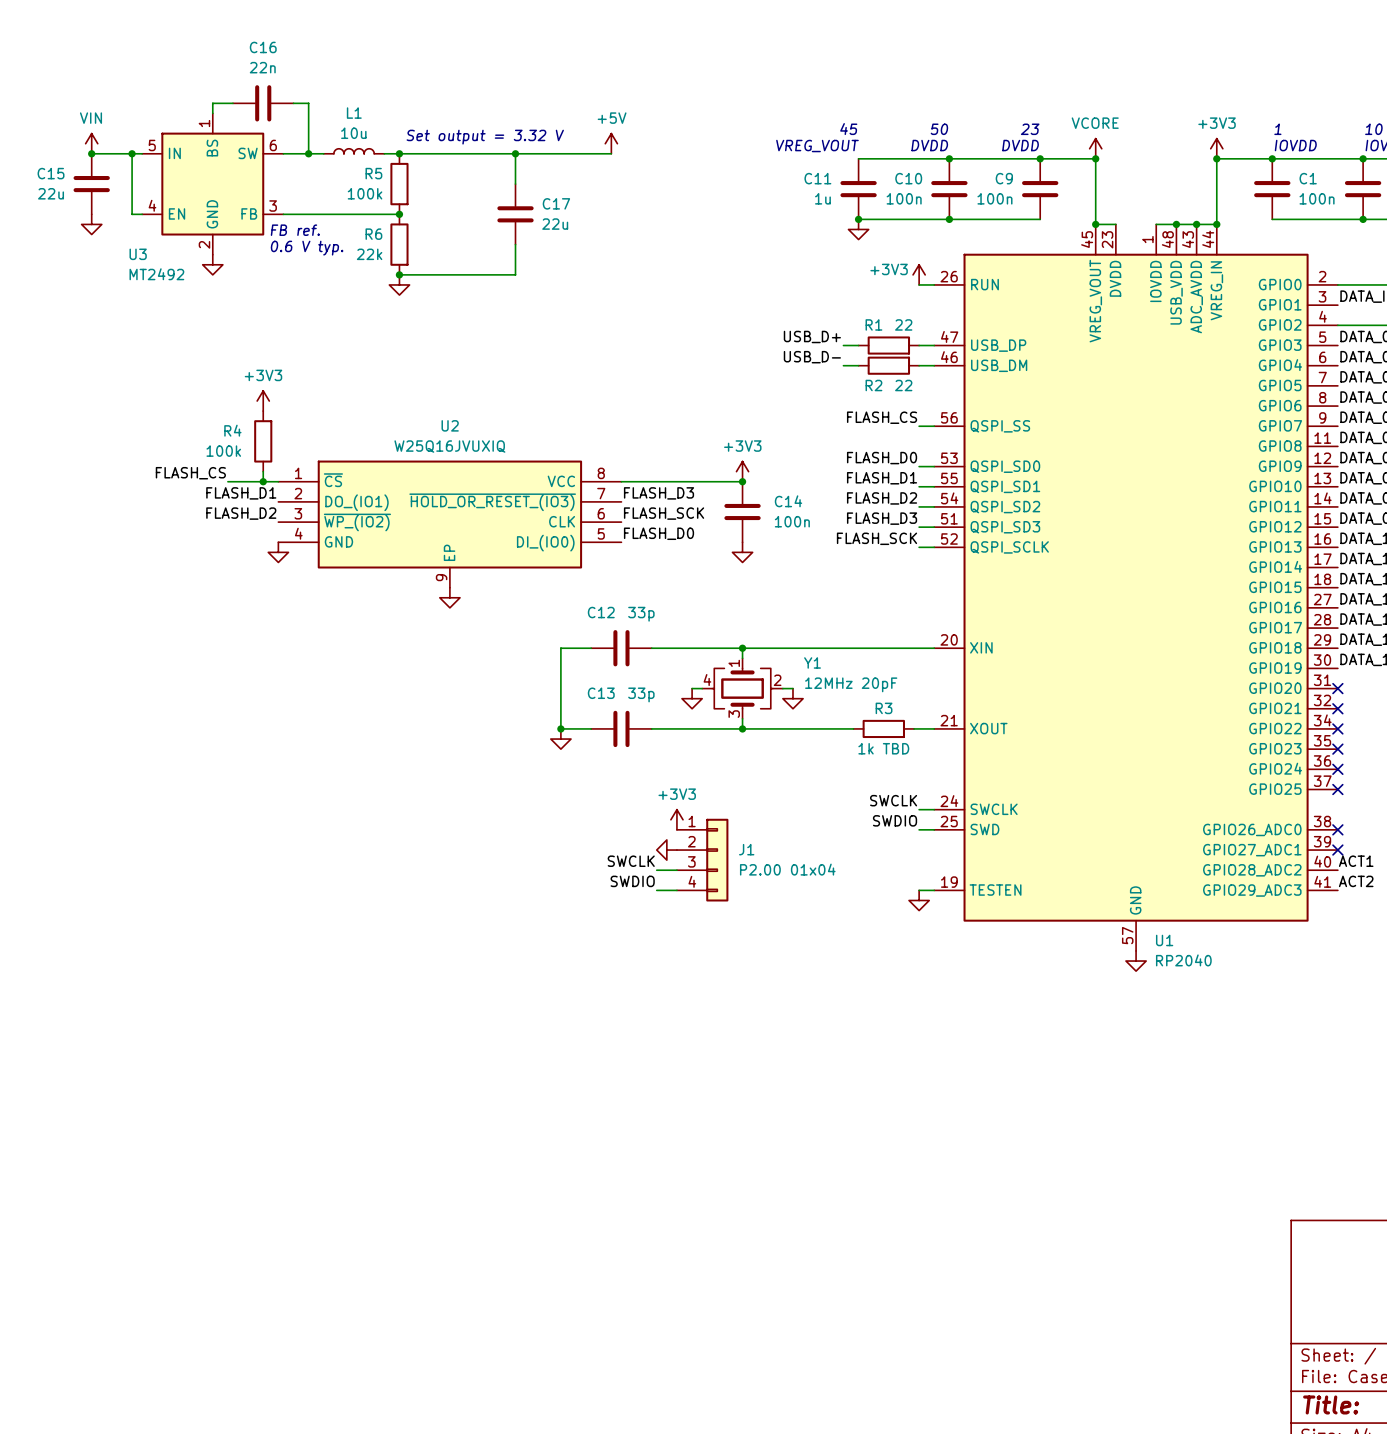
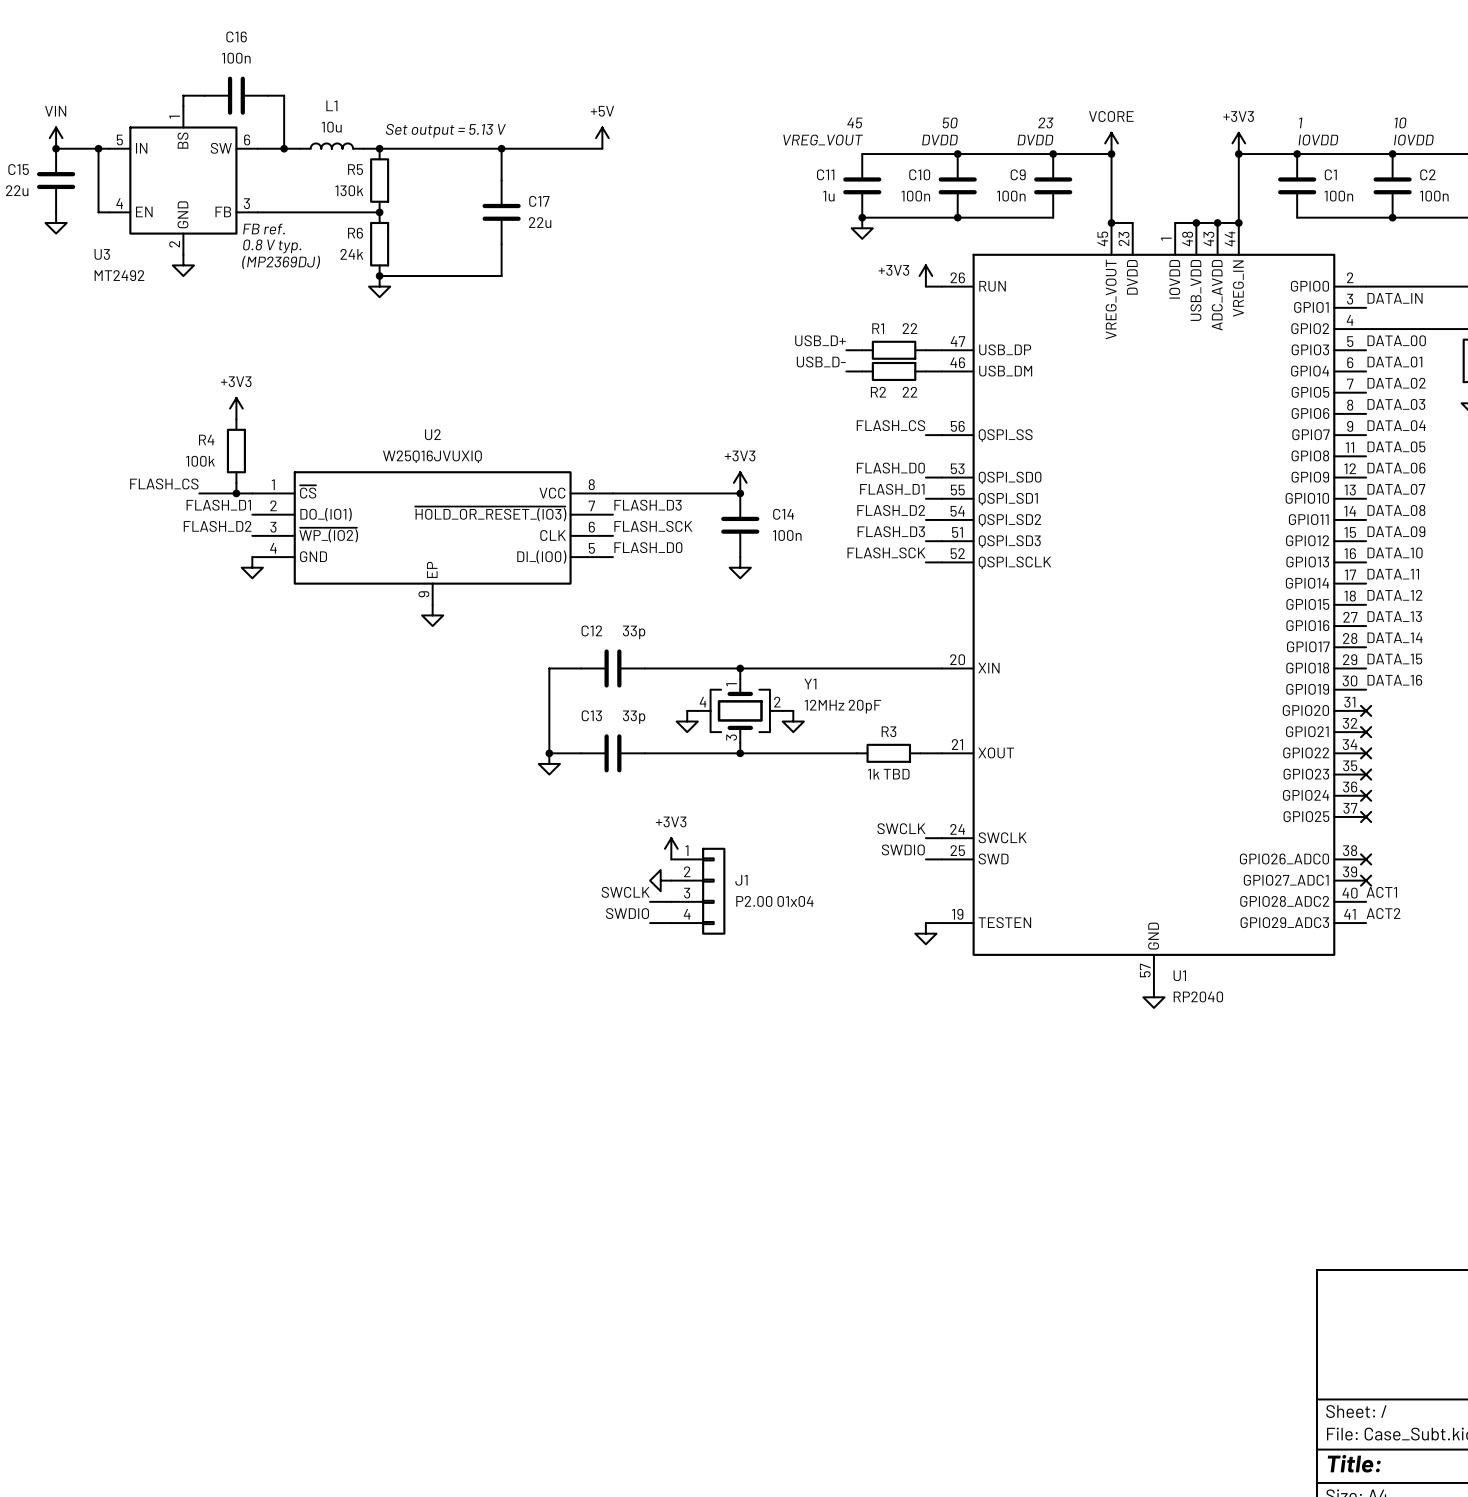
C16 value: 22n (262, 67) -> 100n (236, 58)
text: Set output = 3.32 V (485, 137) -> Set output = 5.13 V (445, 130)
R5 value: 100k (365, 193) -> 130k (349, 190)
text: 0.6 V typ. (307, 248) -> 0.8 V typ. (272, 246)
R6 value: 22k (369, 254) -> 24k (351, 254)
text: none -> (MP2369DJ) (281, 262)

